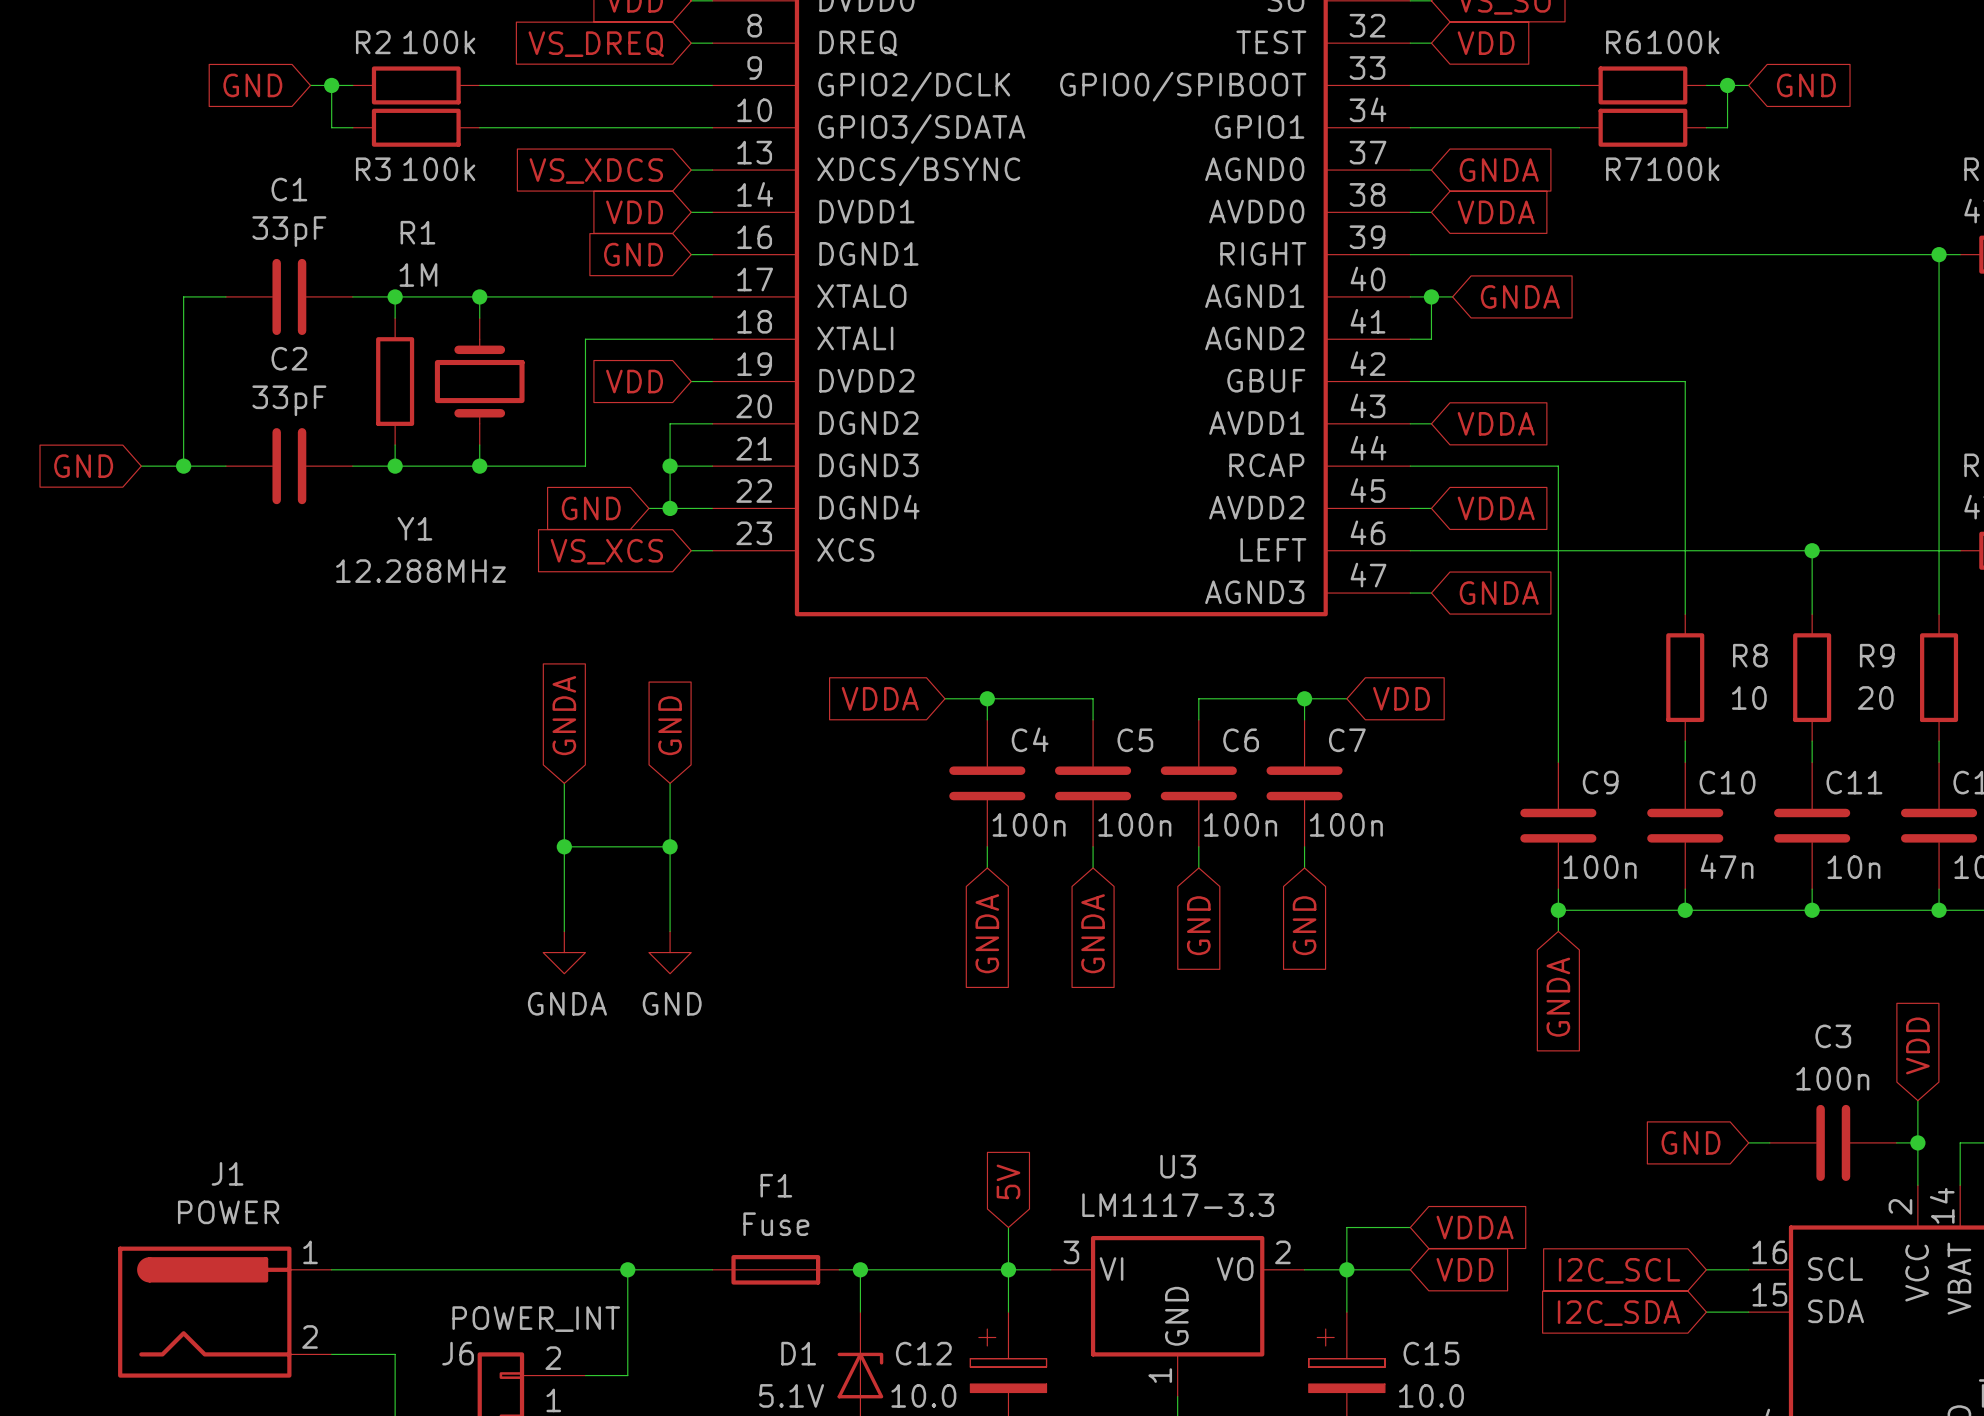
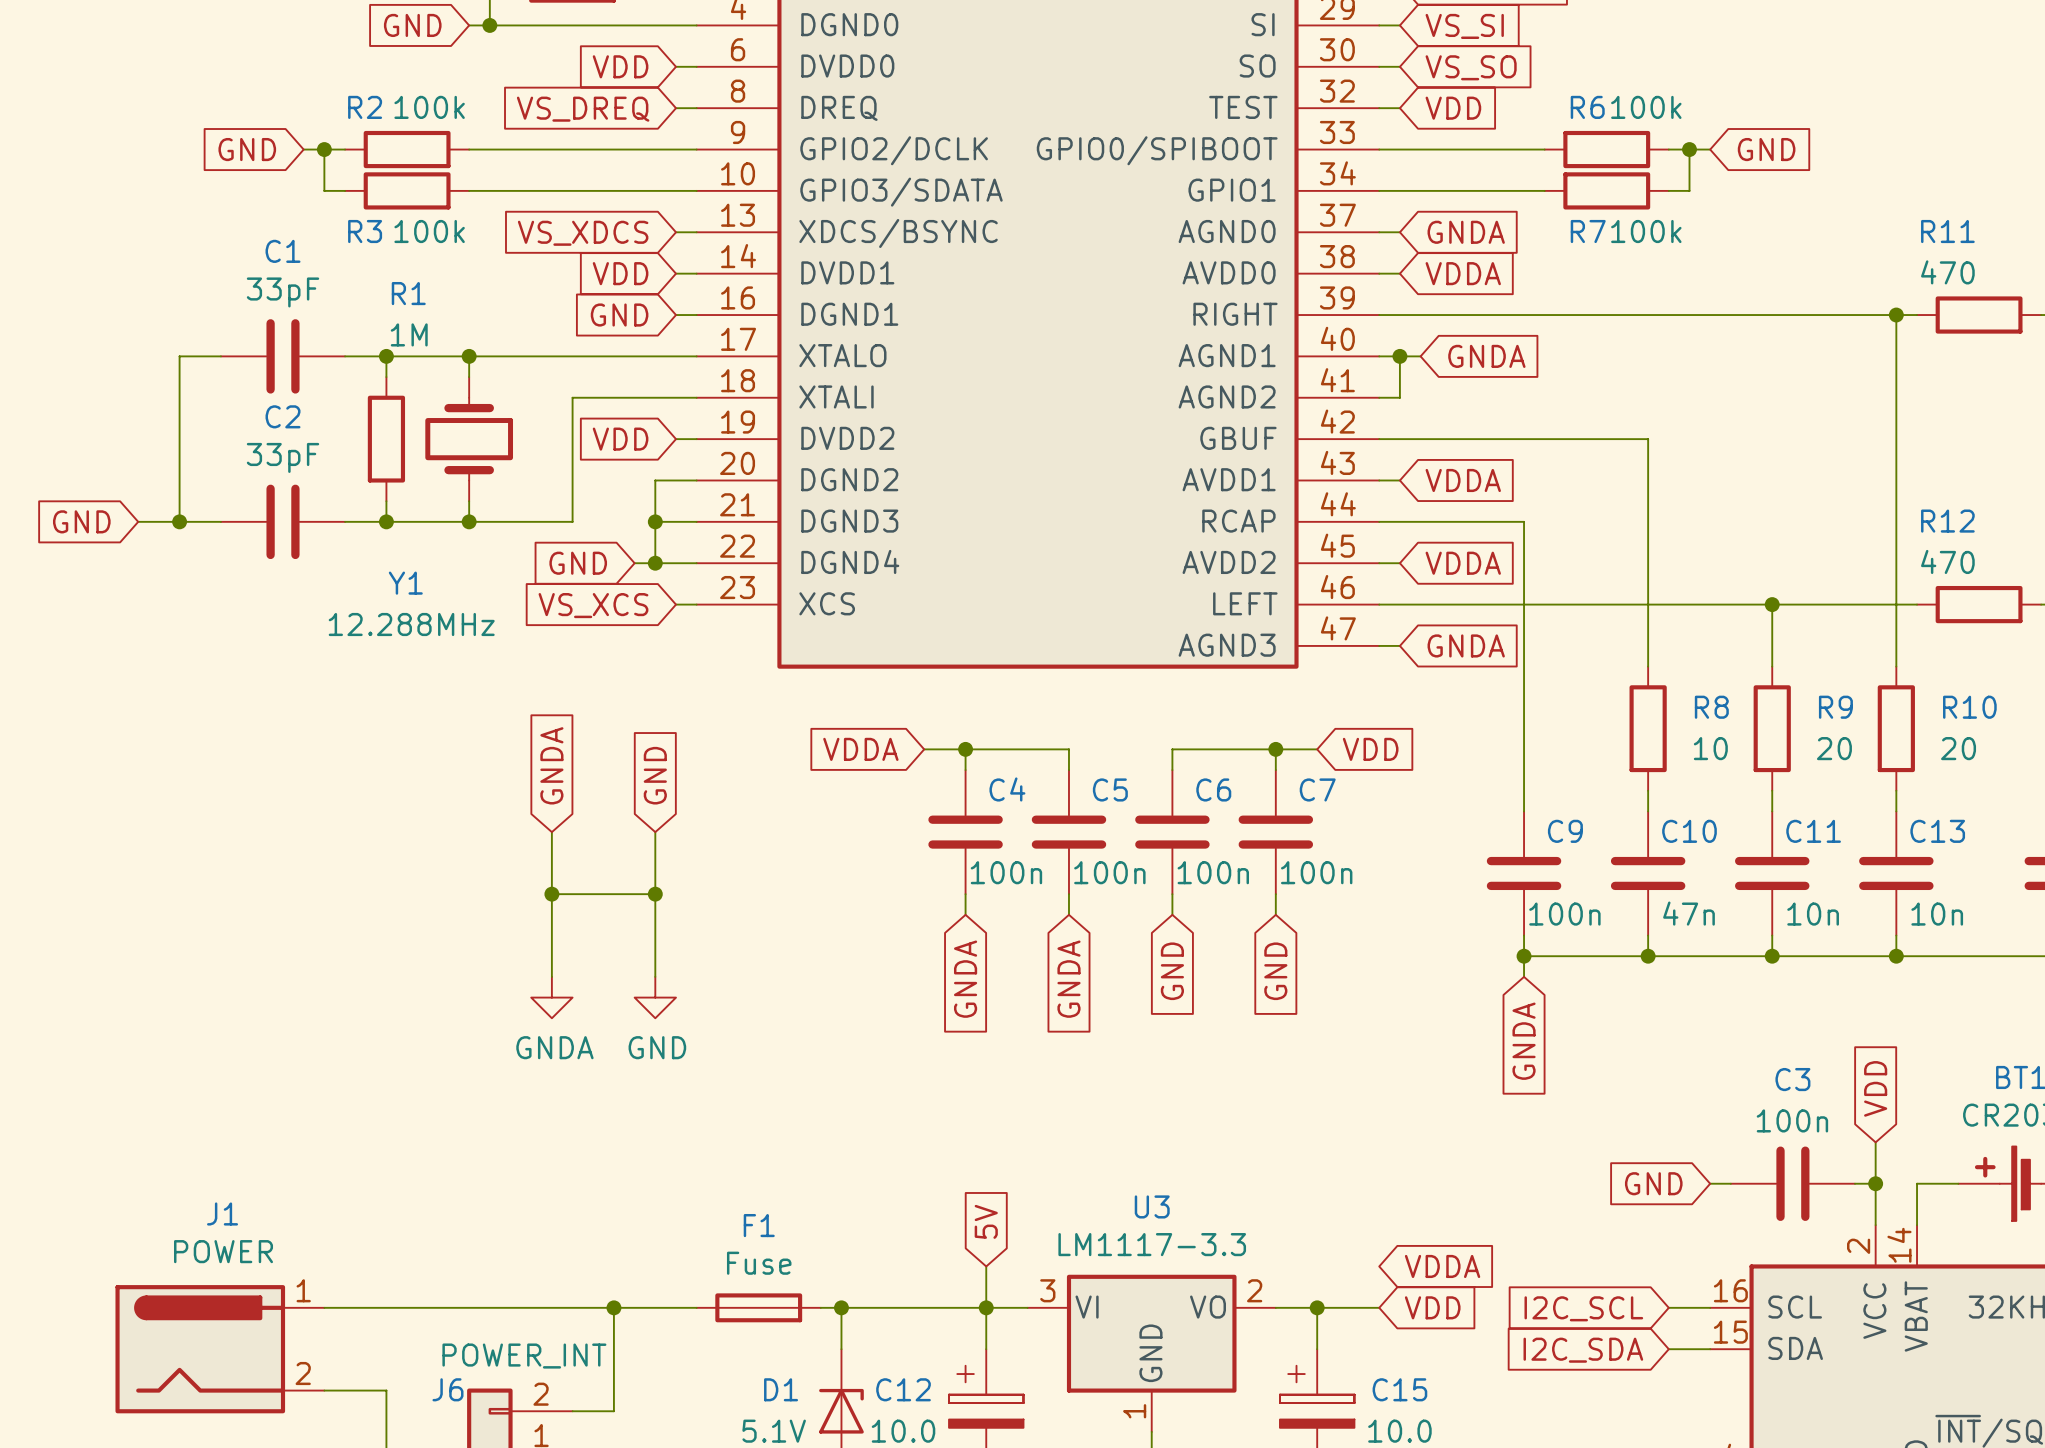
wire: (1410, 1227) (1346, 1227) (1346, 1269) -> none

